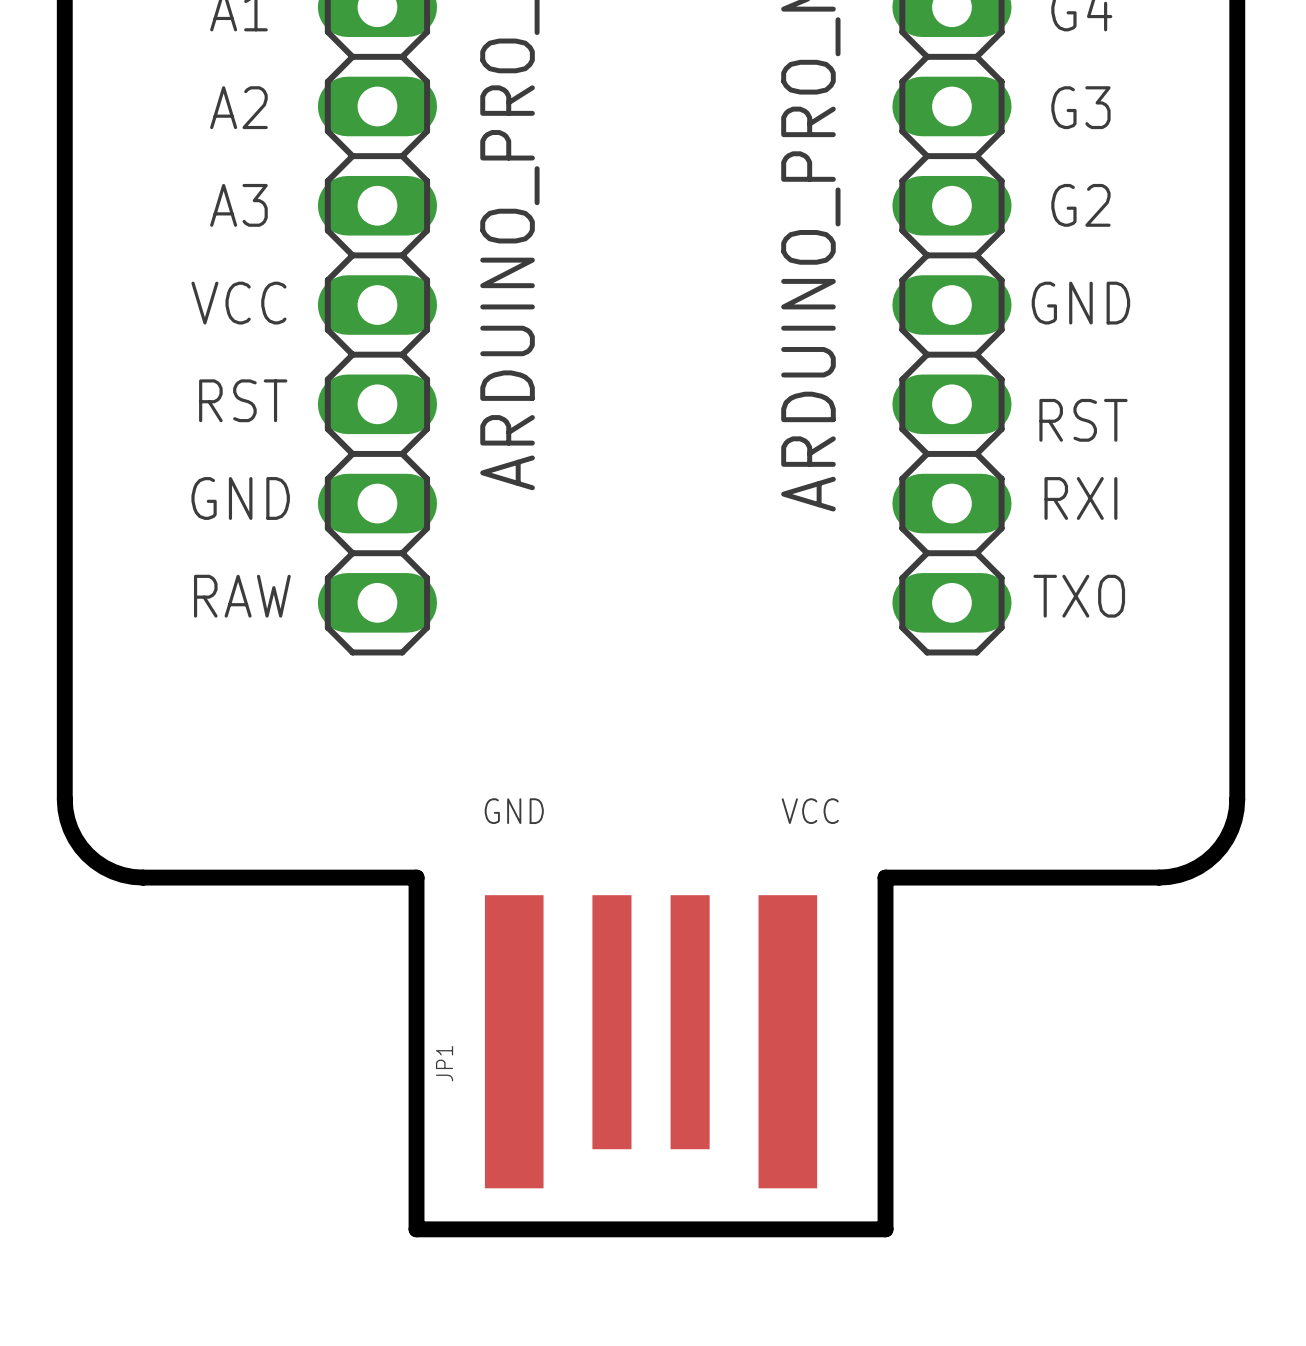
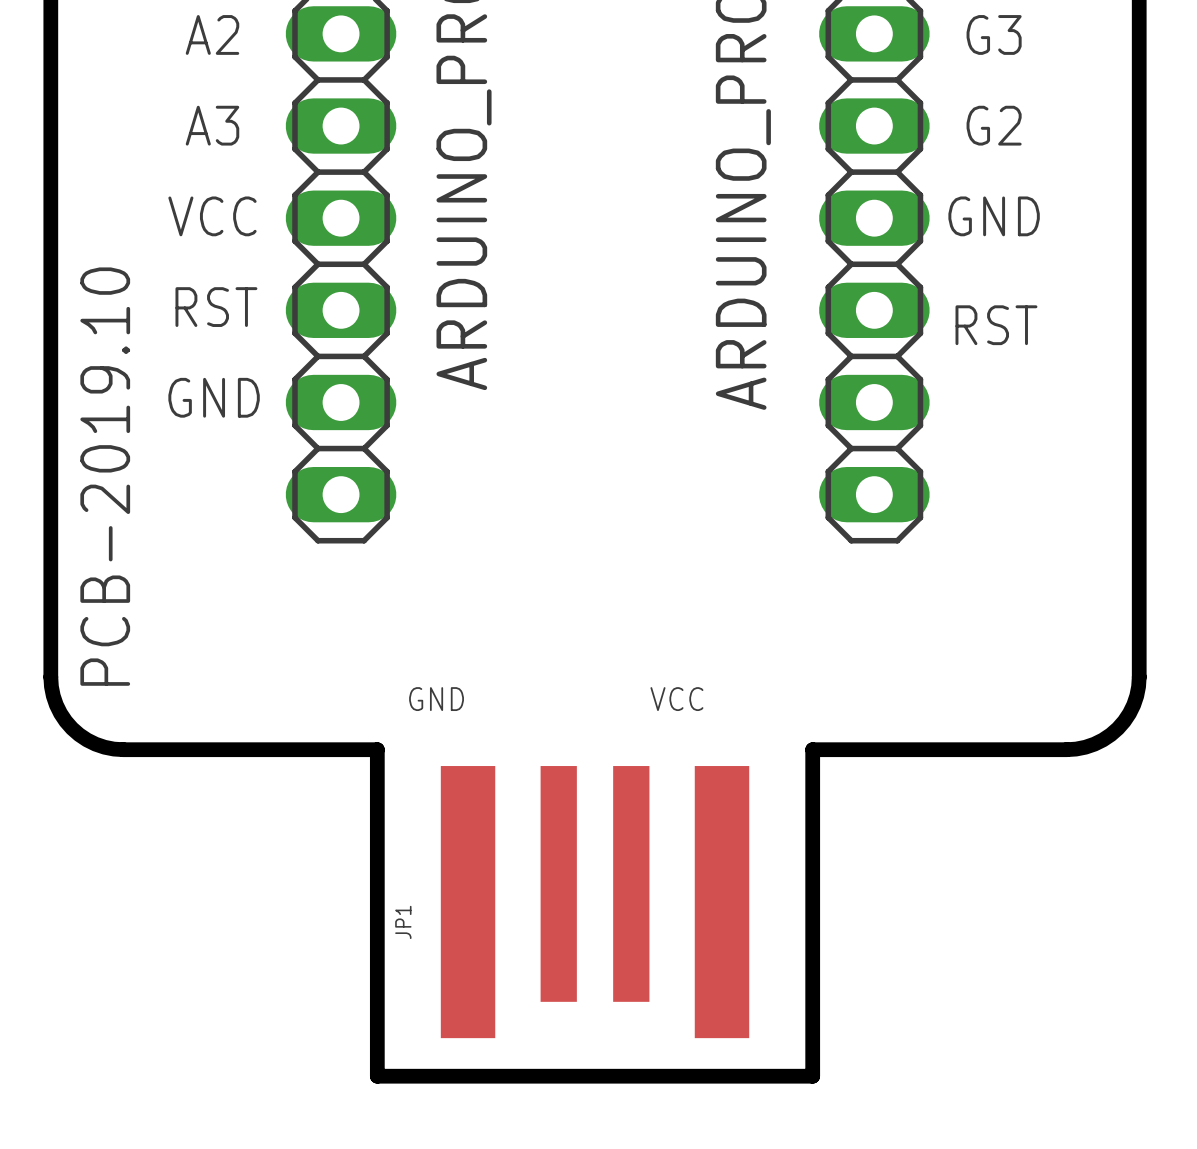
text: RXI (1080, 498) -> none
text: none -> PCB-2019.10 (105, 476)
text: RAW (242, 596) -> none
text: TXO (1079, 596) -> none
text position: GND (514, 811) -> GND (436, 699)
text position: VCC (810, 811) -> VCC (676, 699)

